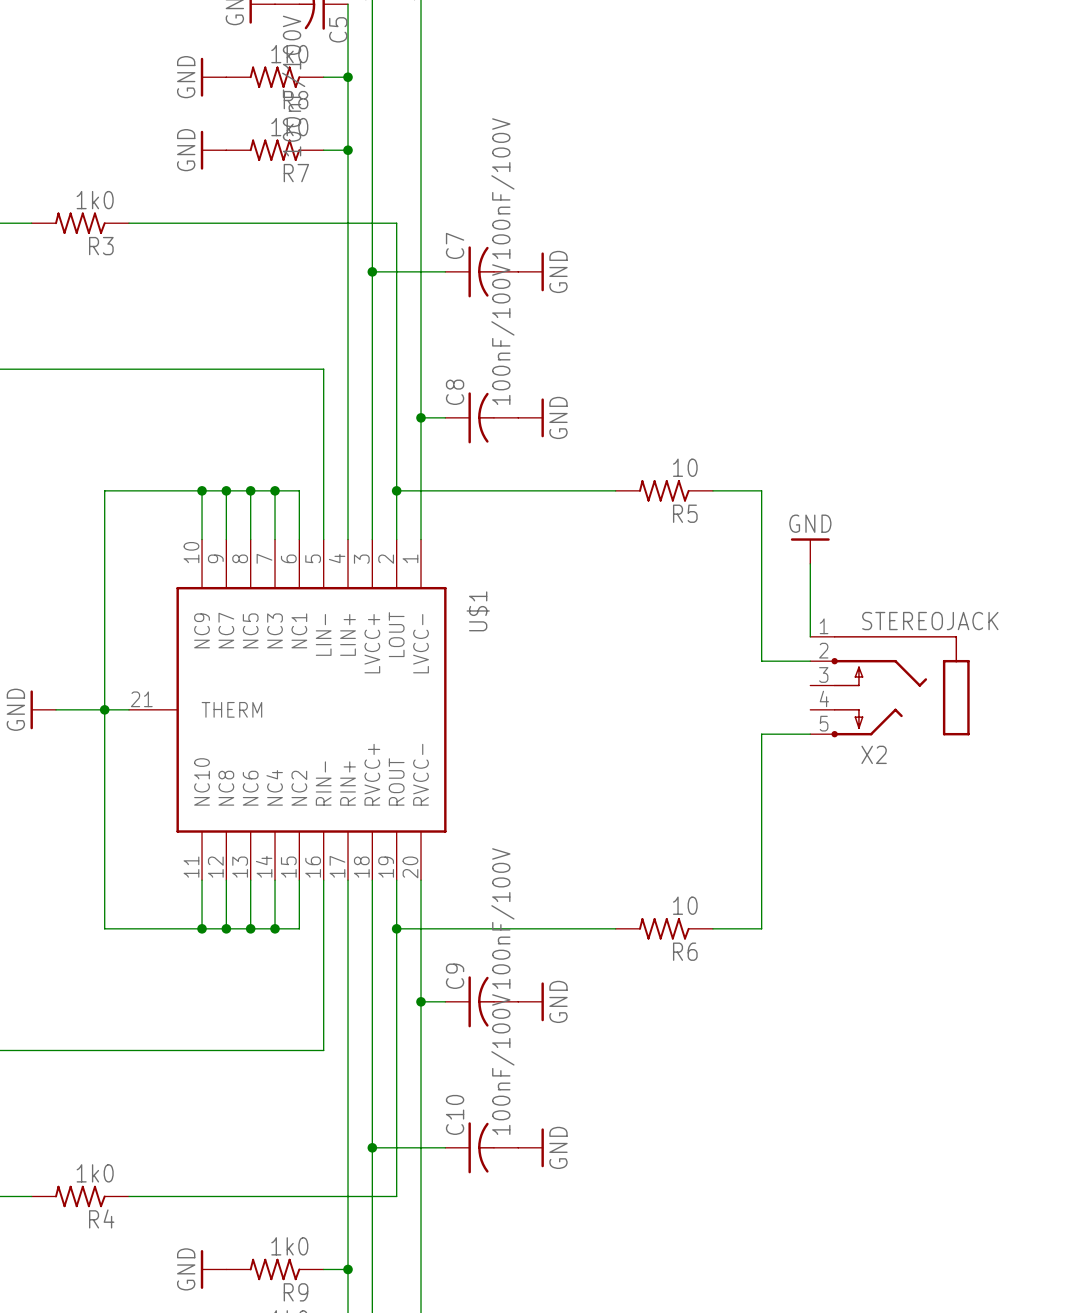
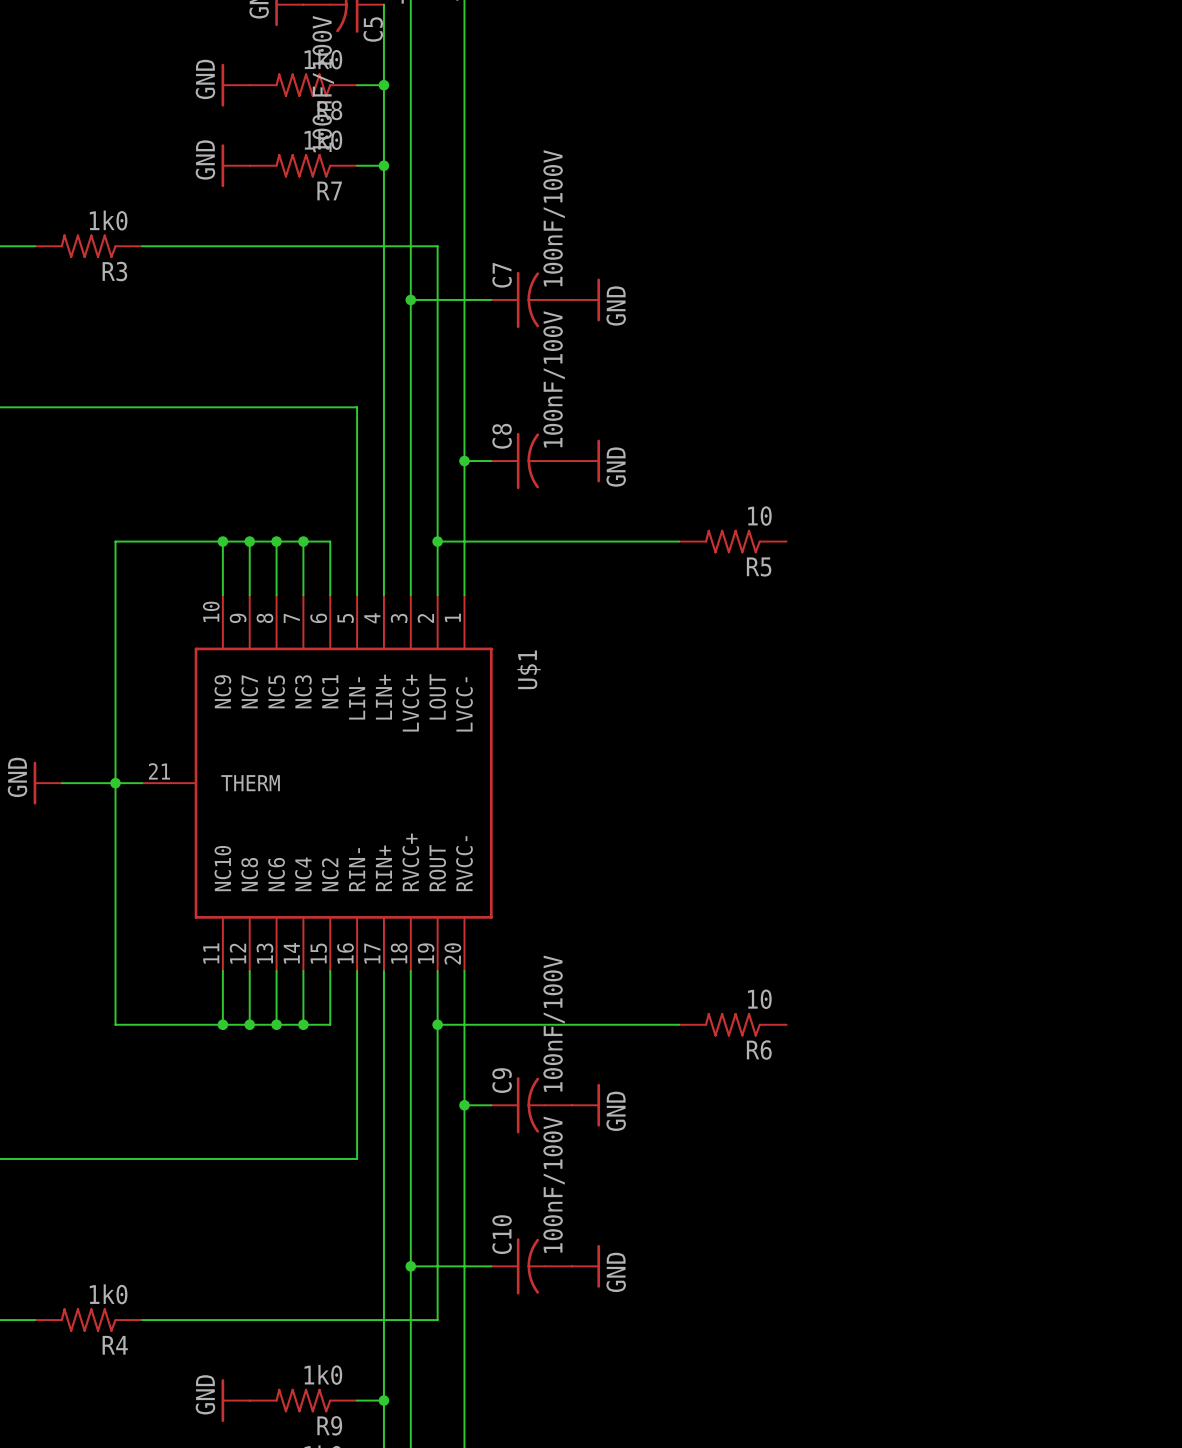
wire: (712, 490) (761, 490) (761, 661) (810, 661) -> none
power symbol: GND (810, 551) -> none
wire: (810, 563) (810, 636) -> none
X2: STEREOJACK (889, 686) -> none
wire: (810, 734) (761, 734) (761, 928) (712, 928) -> none

